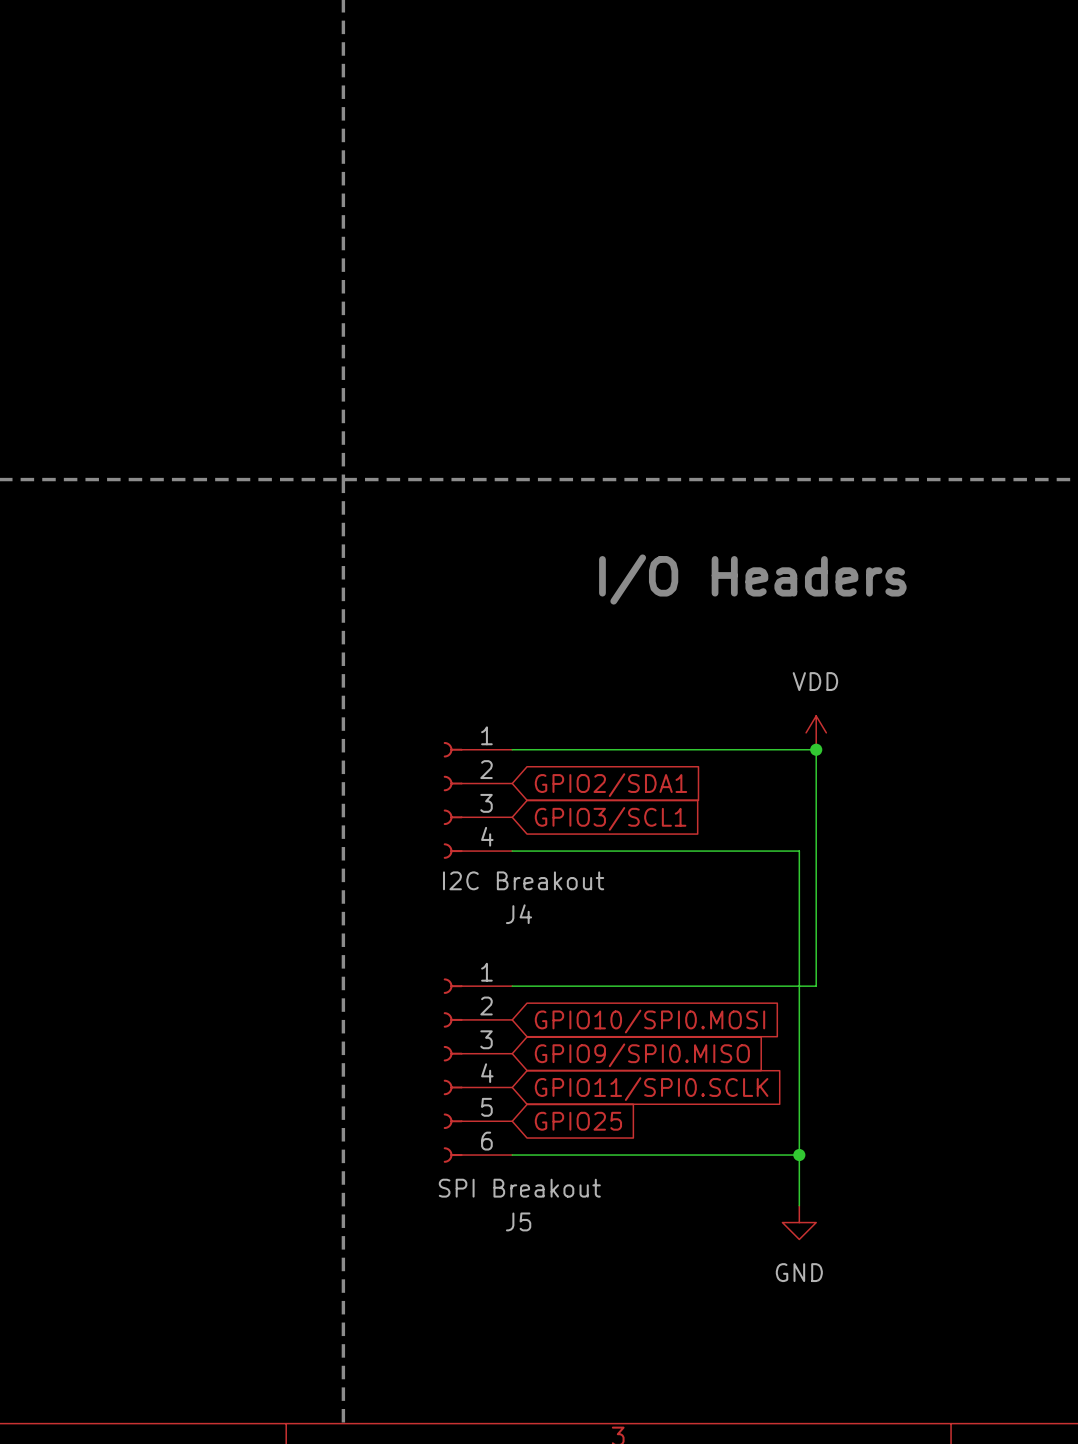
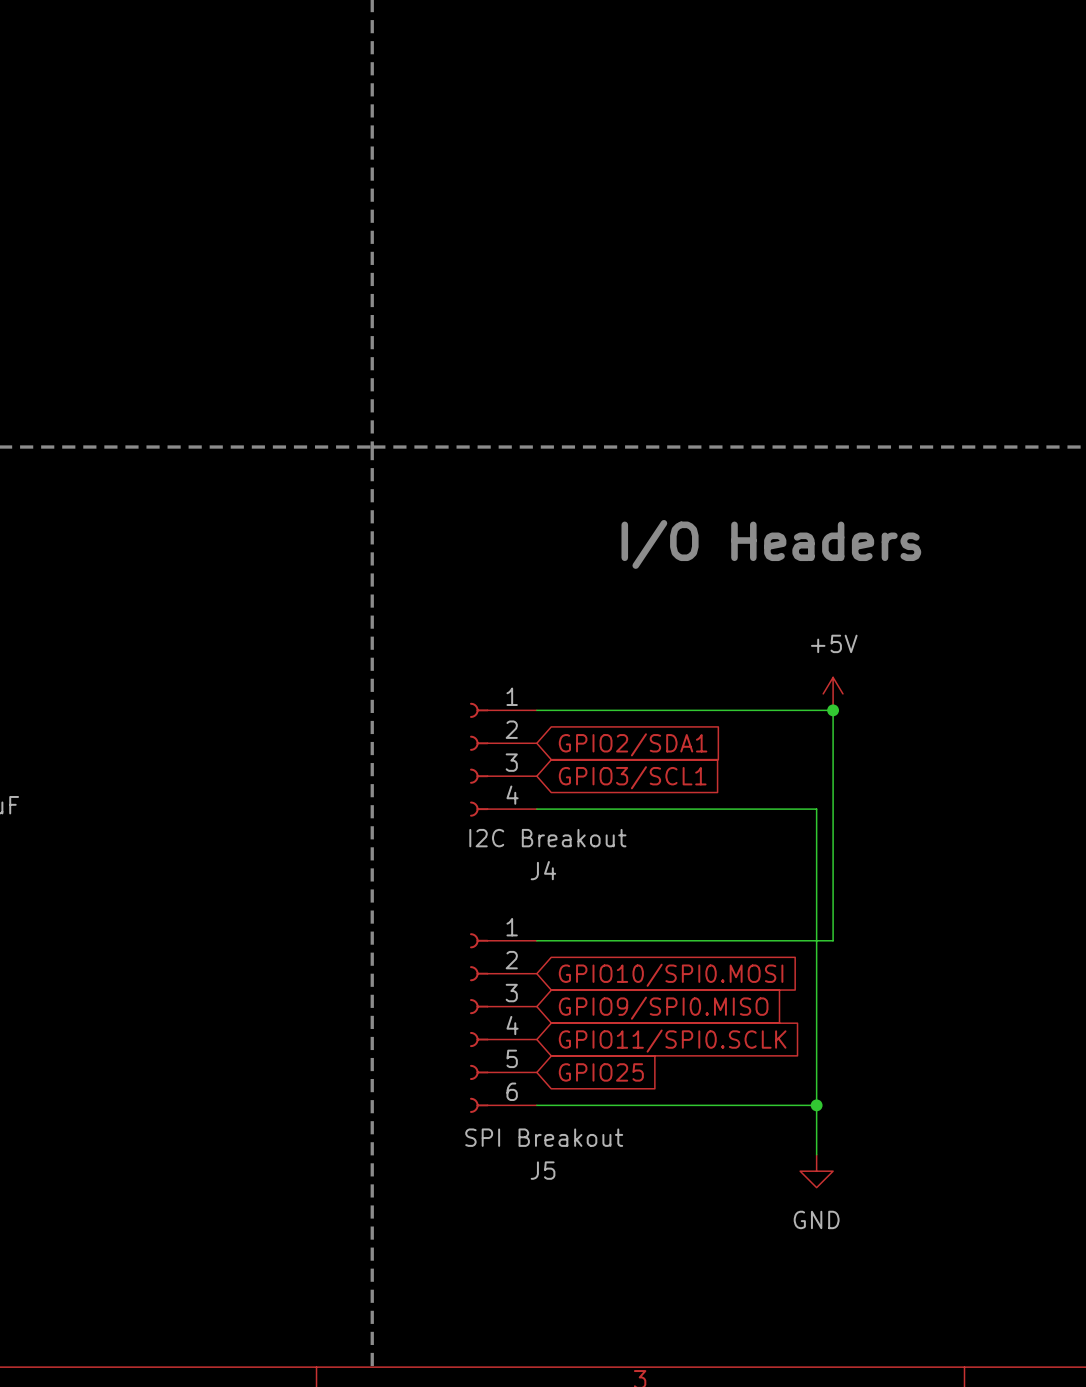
power symbol: VDD (816, 732) -> +5V (833, 693)

